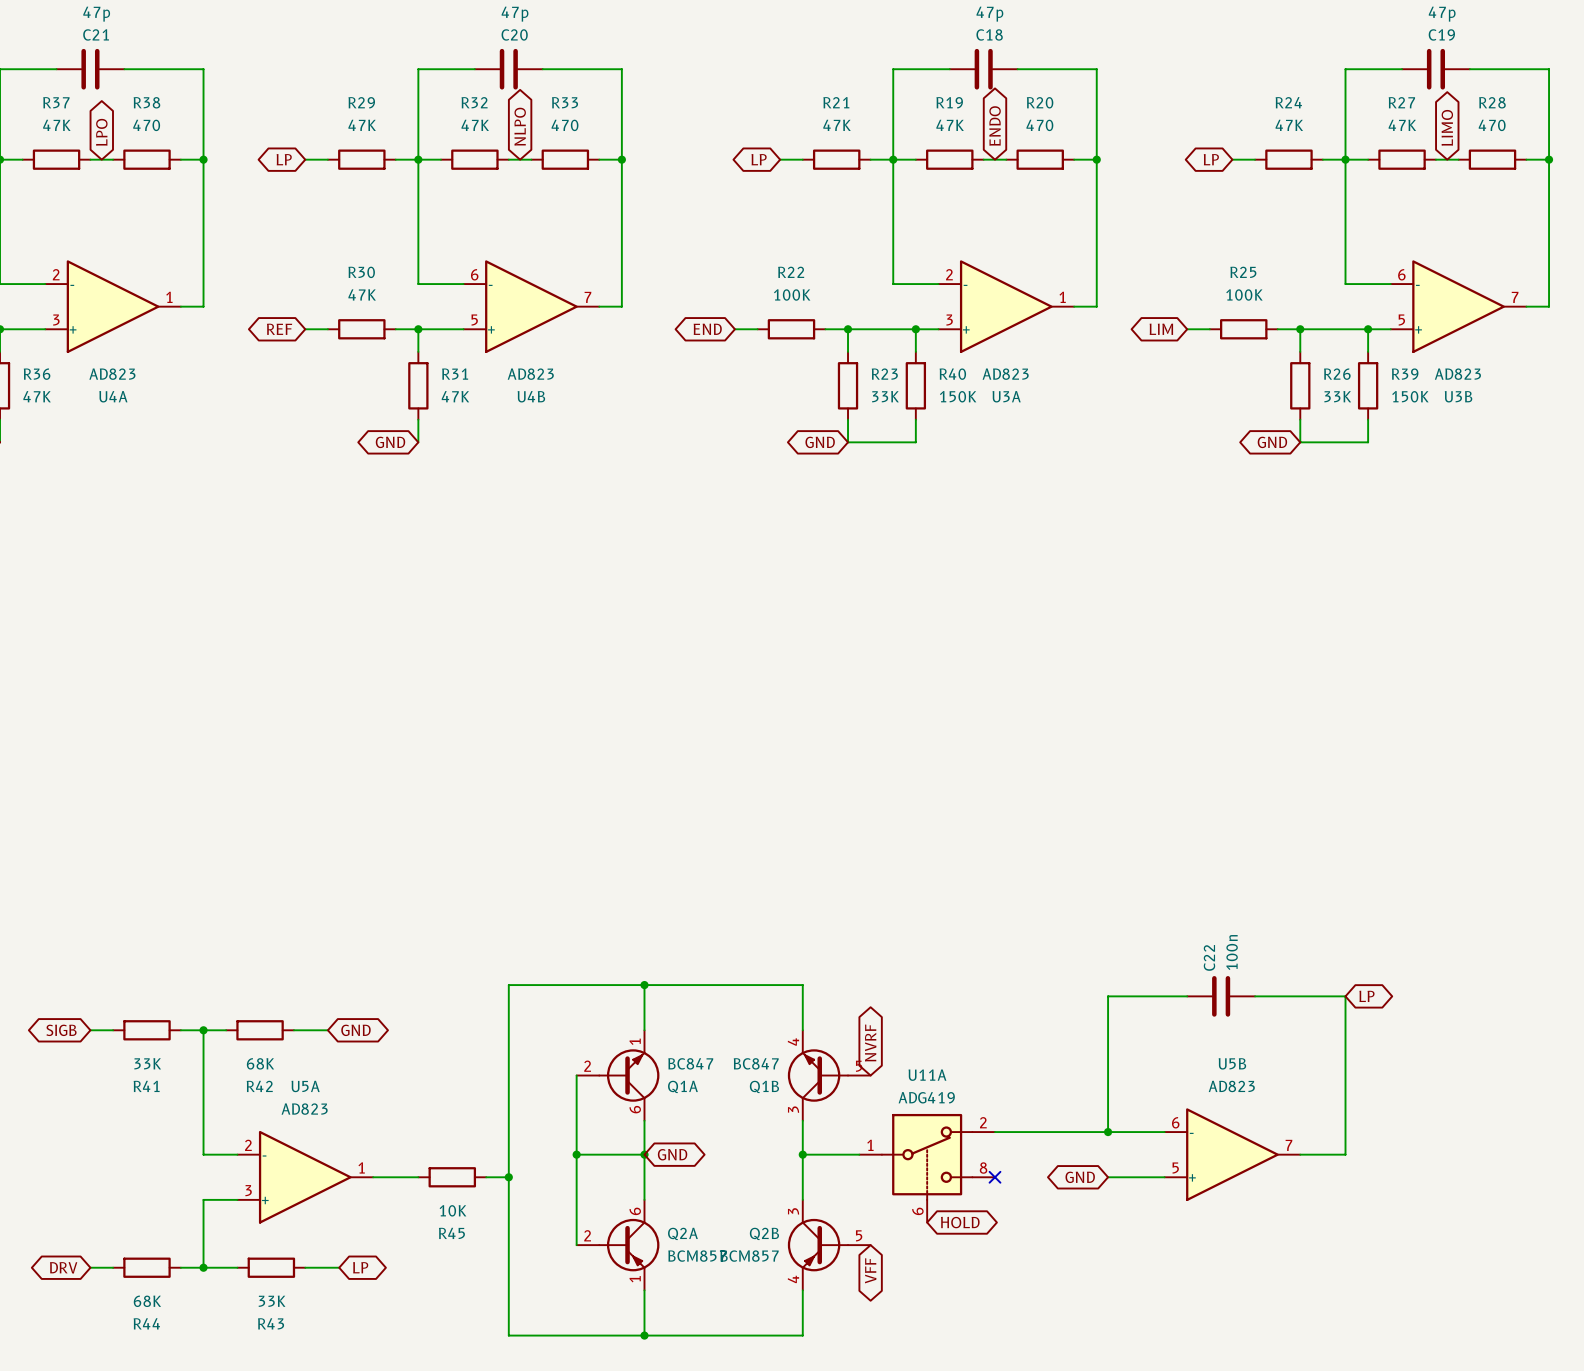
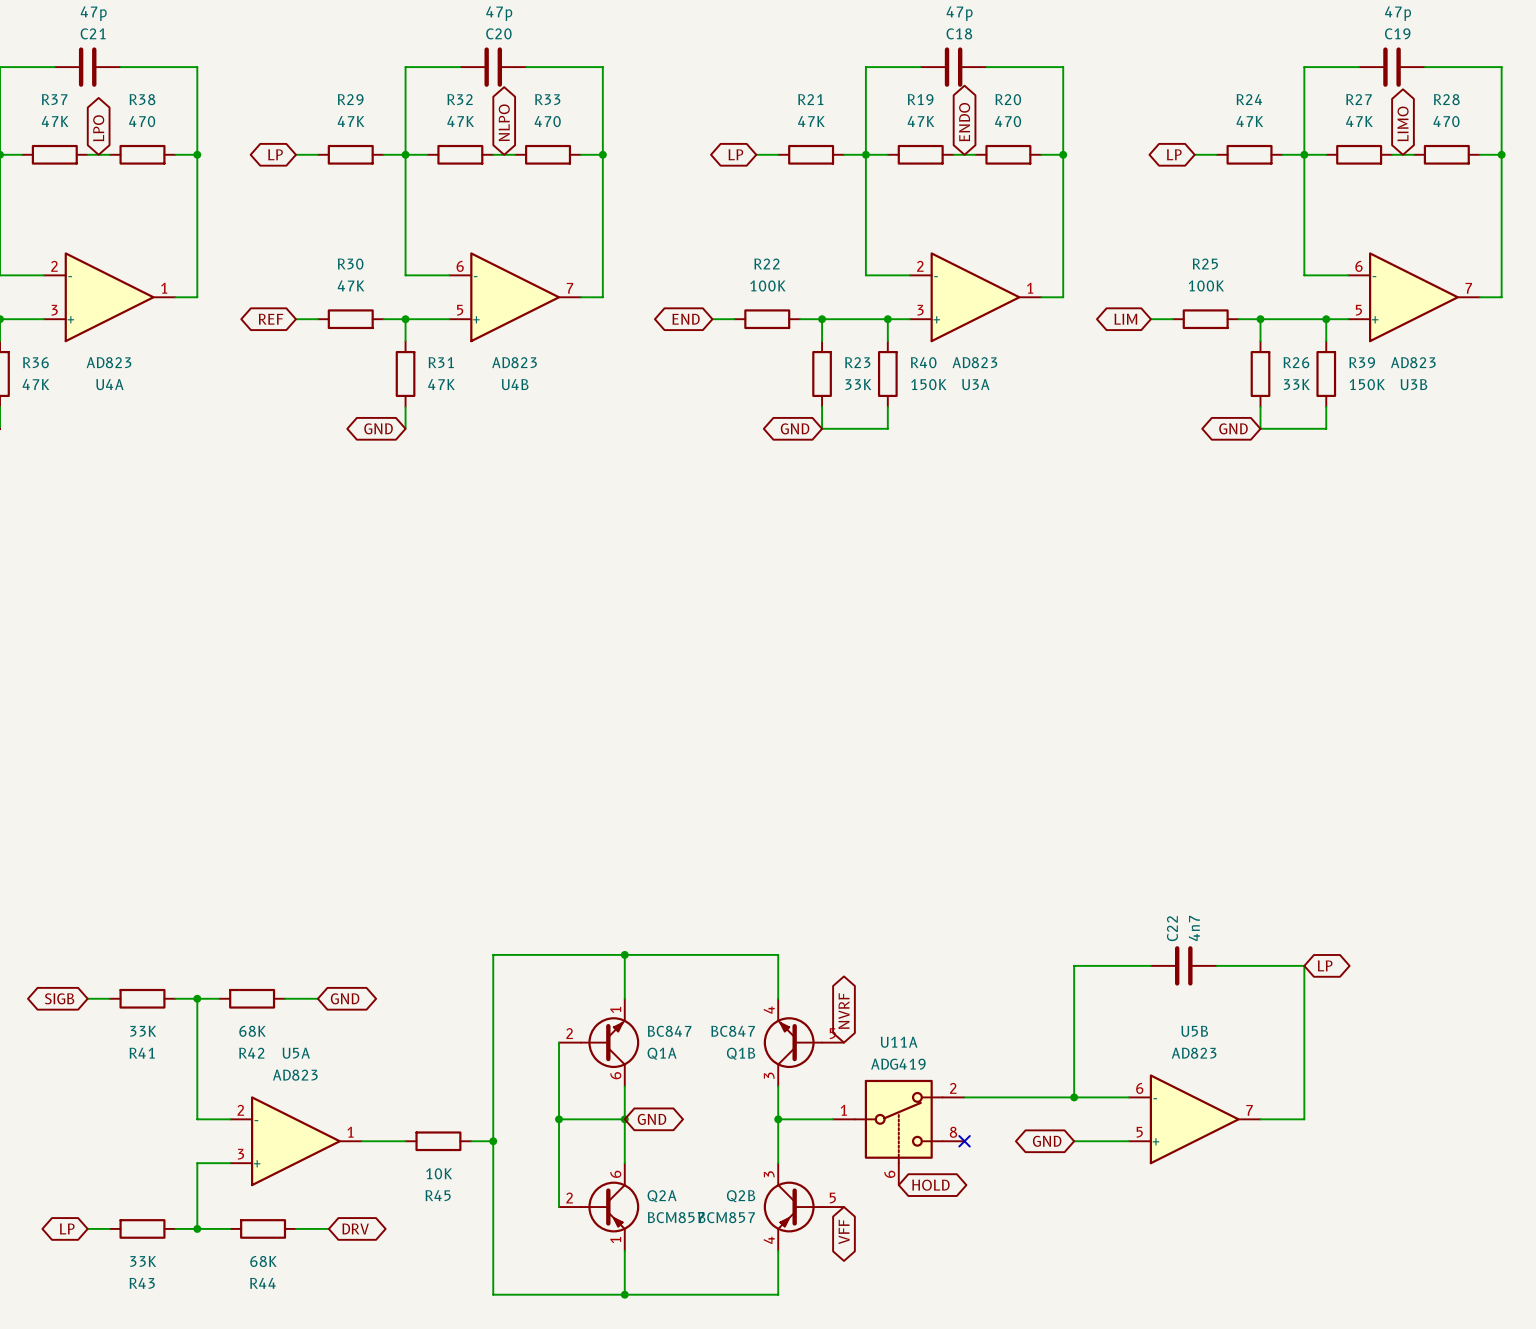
C22 value: 100n (1232, 952) -> 4n7 (1194, 928)
global label: DRV (63, 1267) -> LP (67, 1228)
global label: LP (360, 1267) -> DRV (355, 1229)
R44 value: 68K (147, 1301) -> 33K (143, 1261)
R43 value: 33K (272, 1301) -> 68K (263, 1261)
R44 name: R44 (146, 1323) -> R43 (142, 1283)
R43 name: R43 (271, 1323) -> R44 (262, 1283)

